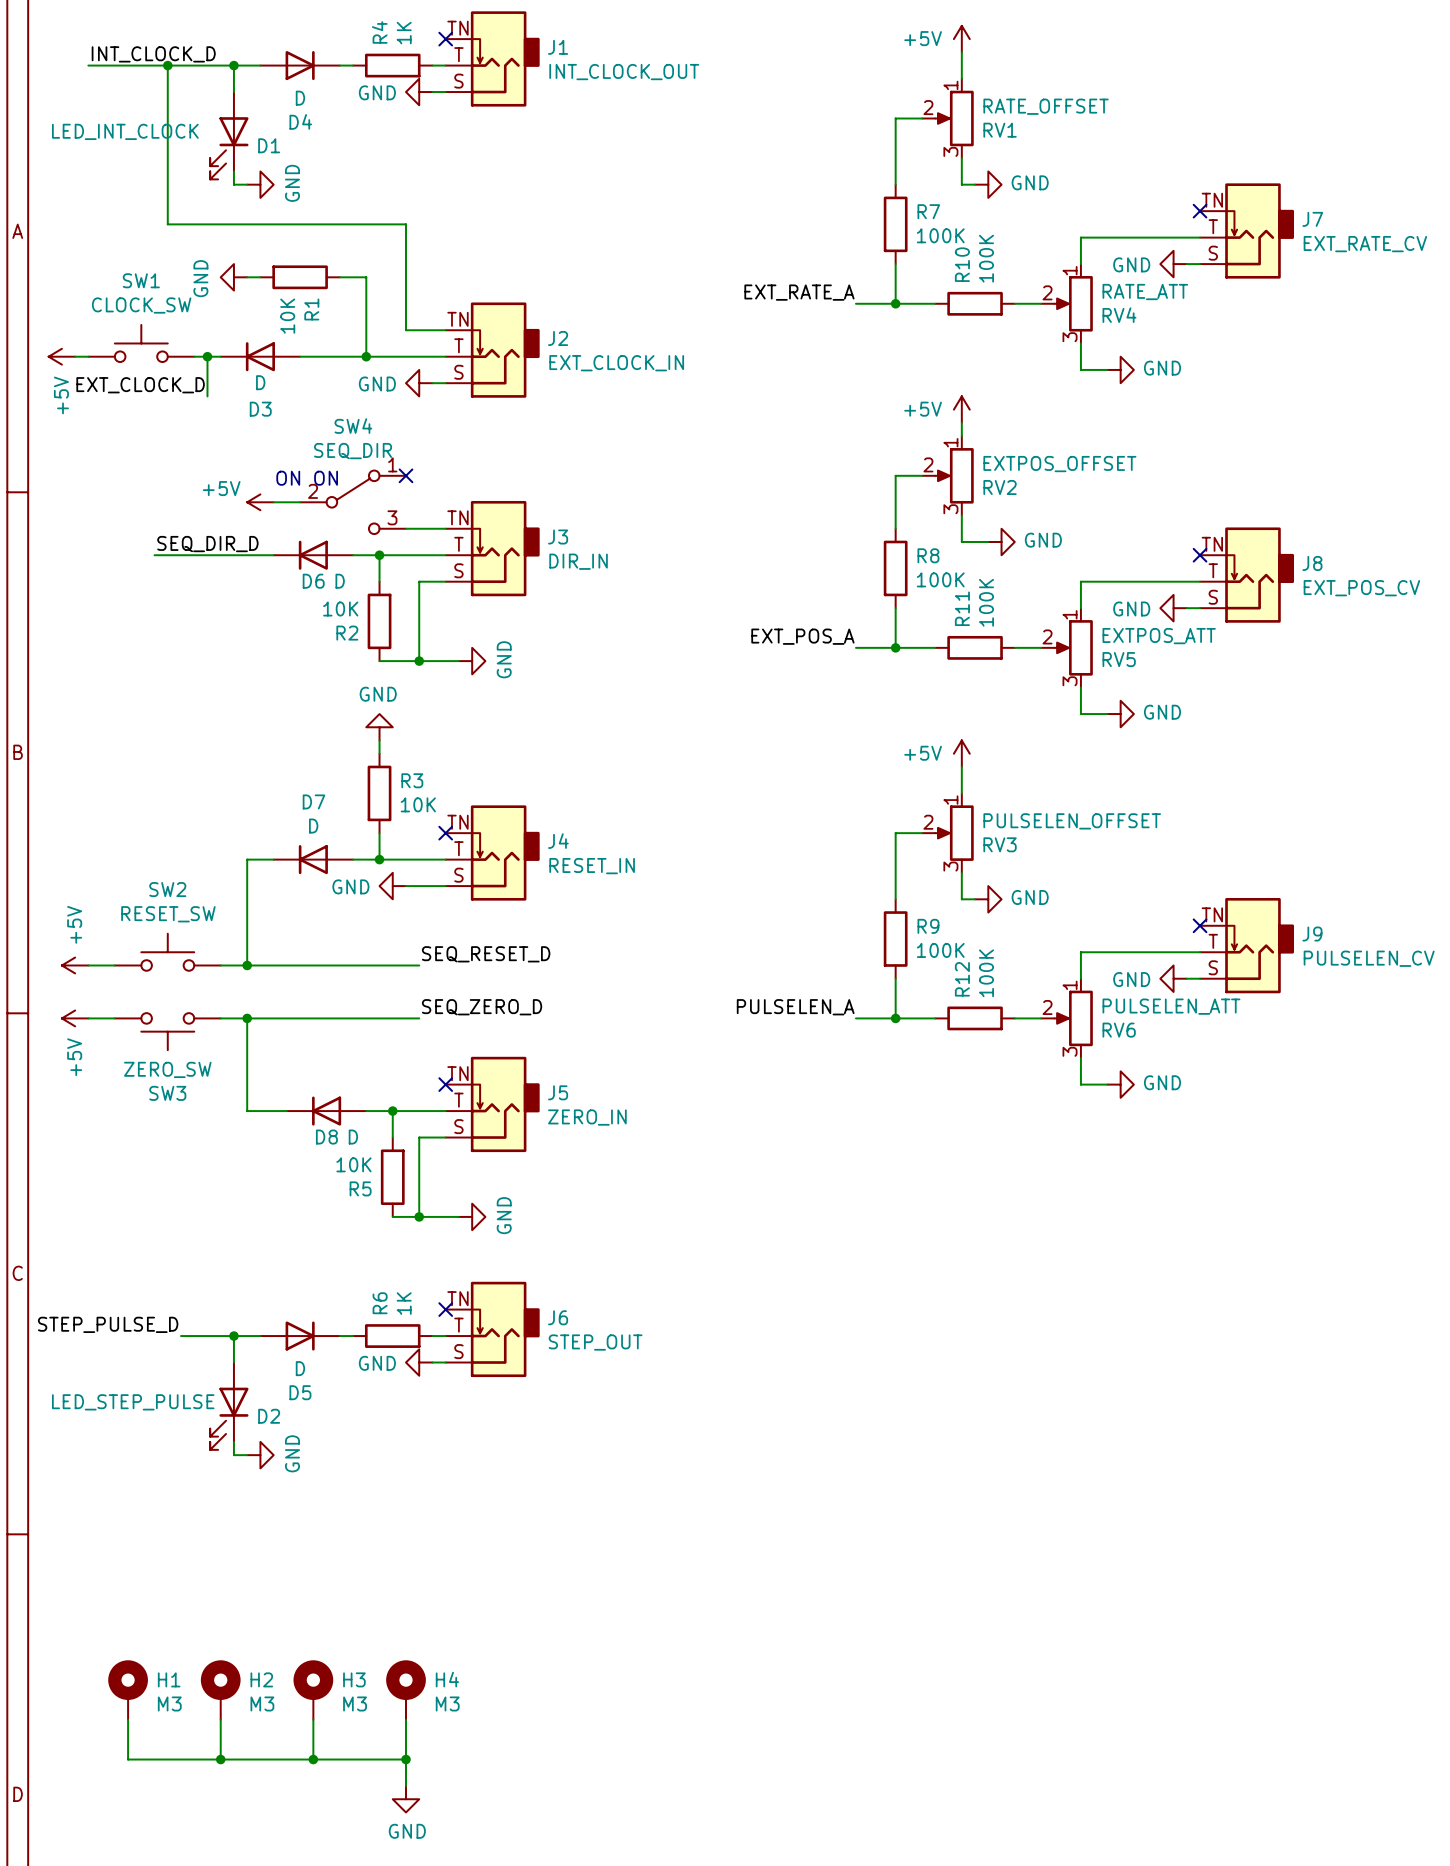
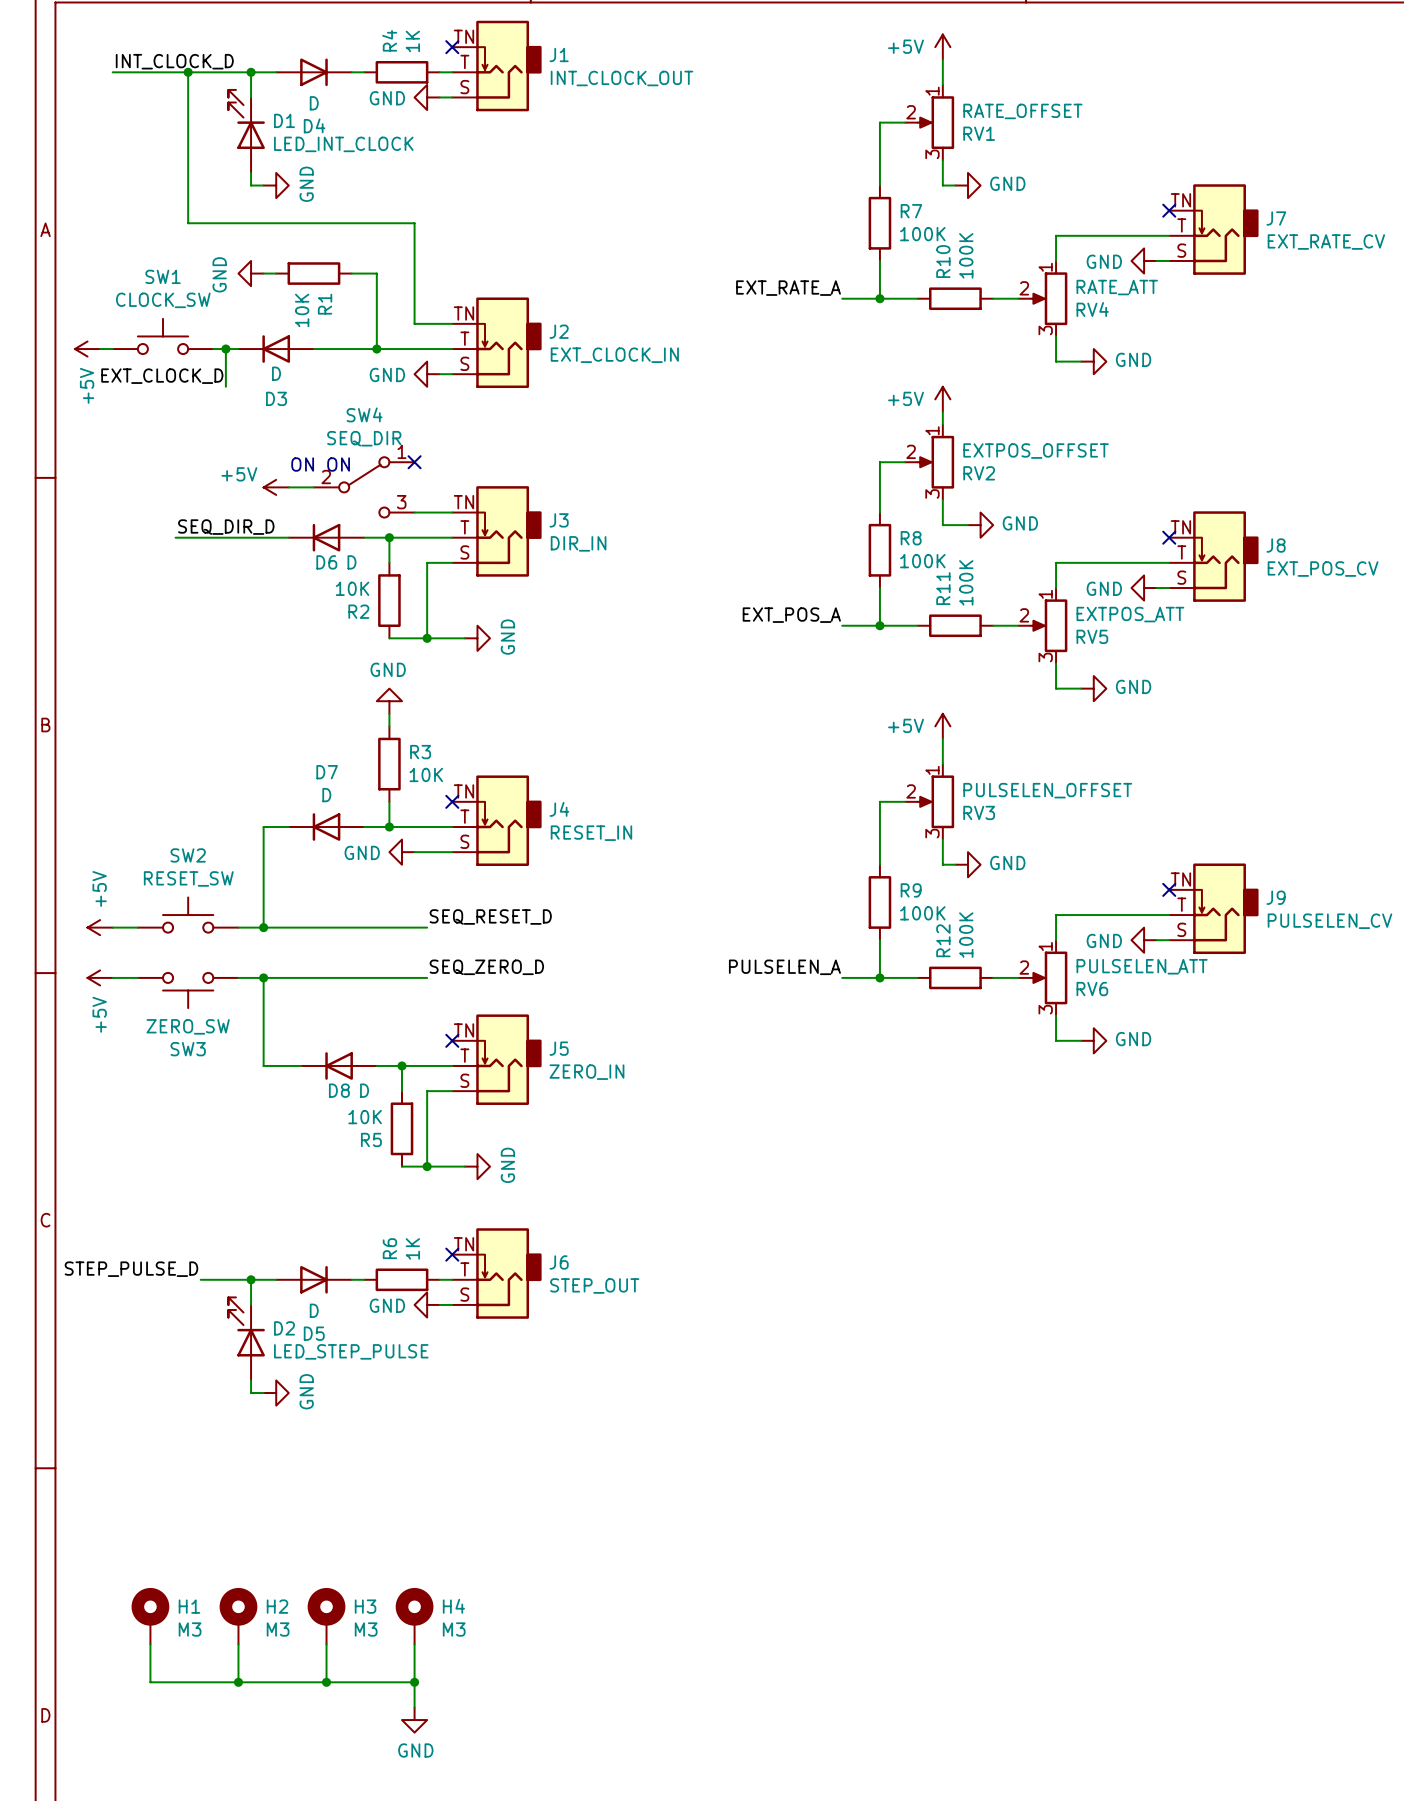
D1 value position: LED_INT_CLOCK (125, 131) -> LED_INT_CLOCK (343, 144)
D1 flip: as is (229, 148) -> up-down (246, 119)
D2 value position: LED_STEP_PULSE (133, 1402) -> LED_STEP_PULSE (351, 1351)
D2 flip: as is (229, 1418) -> up-down (246, 1326)

